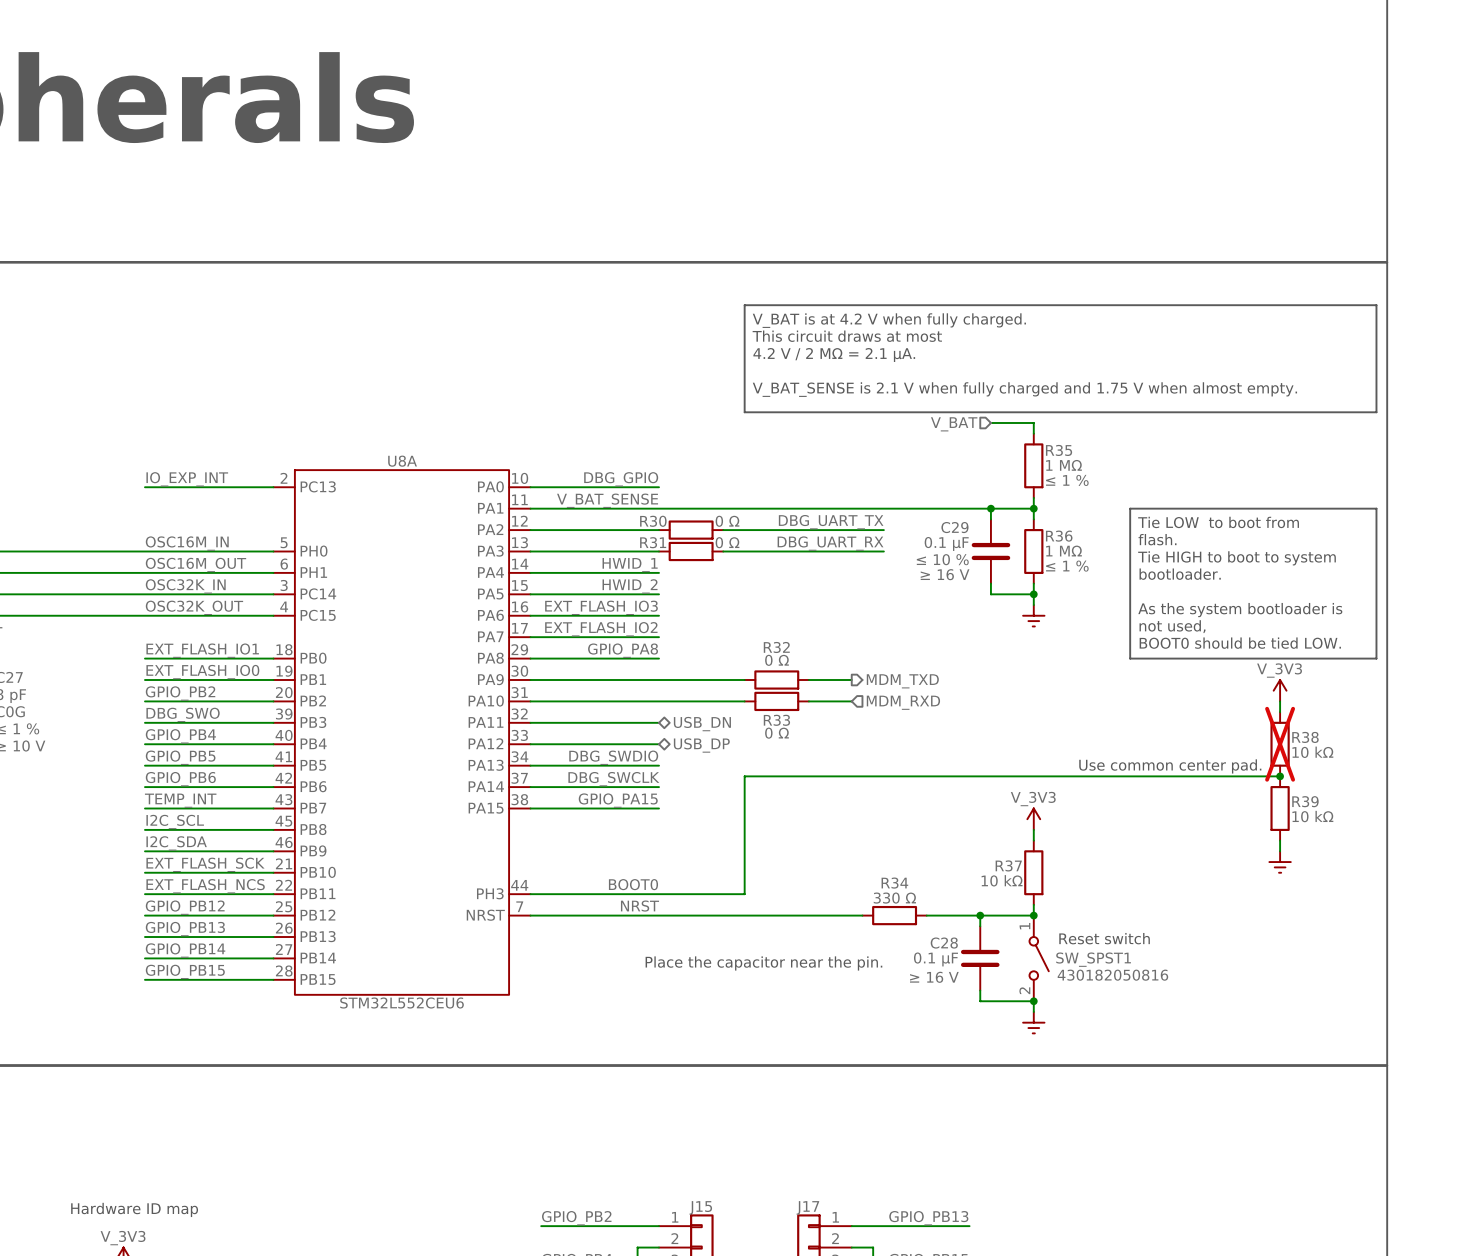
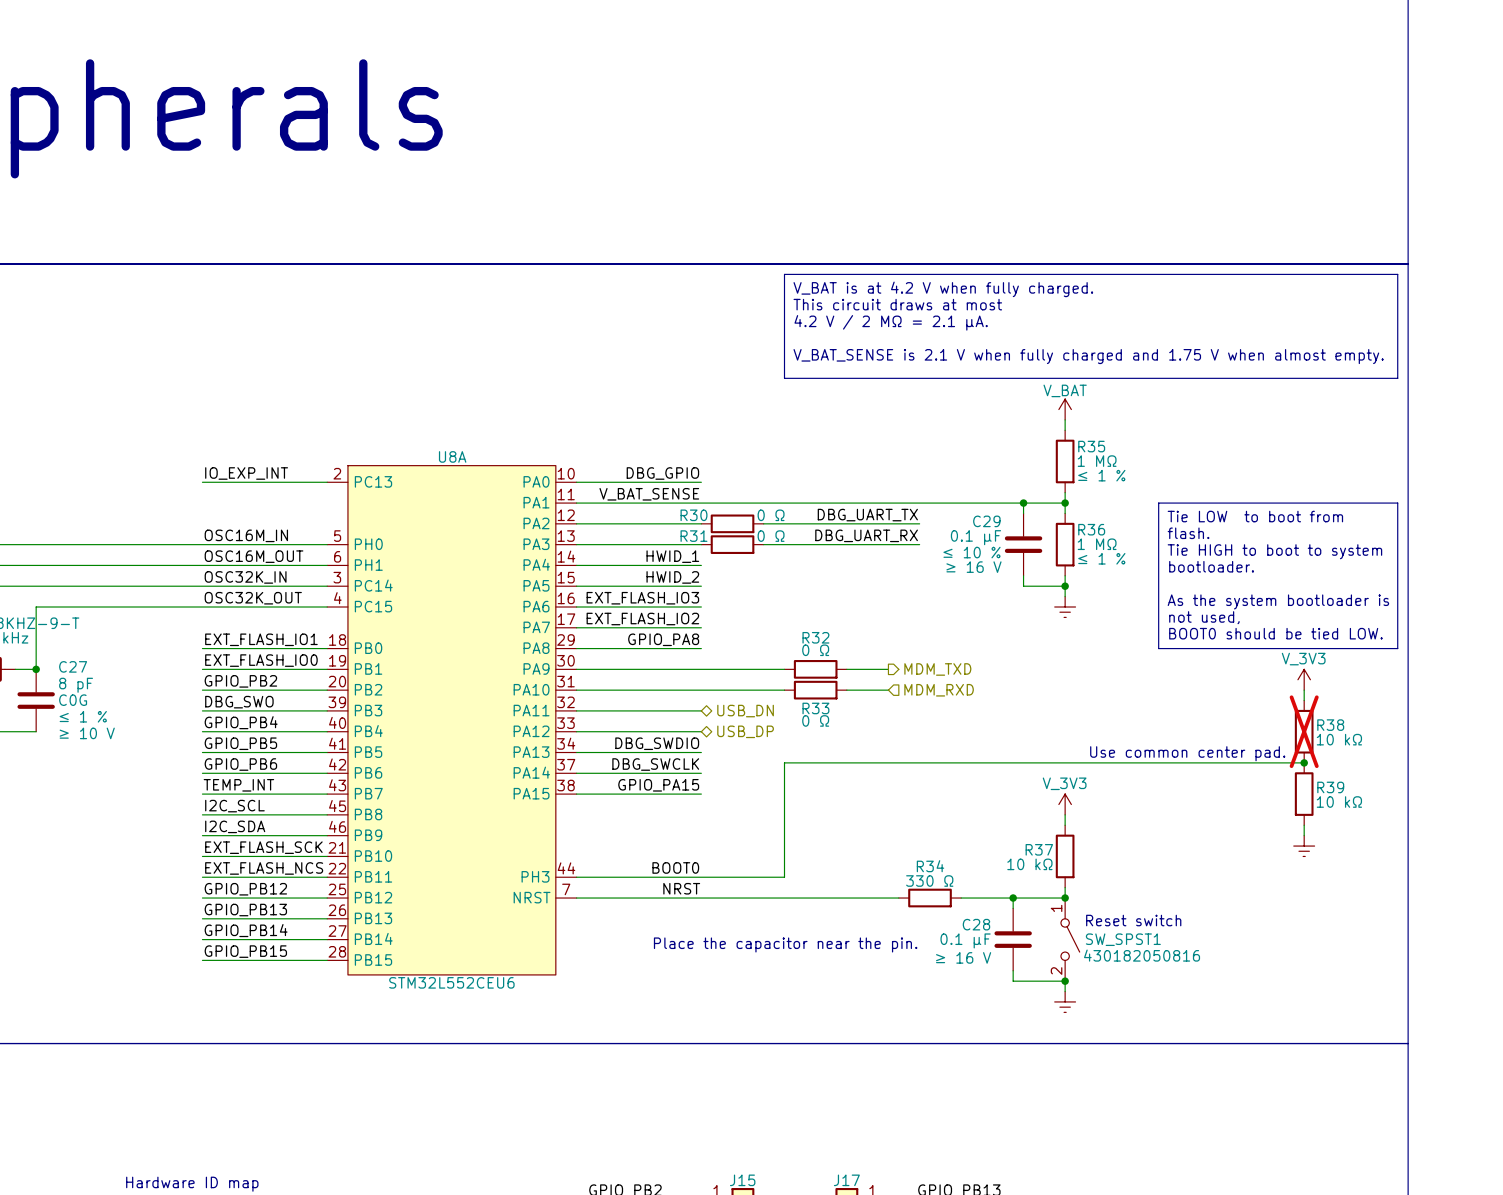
line: (744, 305) (1376, 305) -> (784, 305) (784, 274) (1397, 274) (1397, 305)
text position: V_BAT is at 4.2 V when fully charged. (889, 320) -> V_BAT is at 4.2 V when fully charged. (943, 289)
text position: This circuit draws at most (847, 336) -> This circuit draws at most (897, 304)
text position: 4.2 V / 2 MΩ = 2.1 µA. (834, 355) -> 4.2 V / 2 MΩ = 2.1 µA. (891, 322)
line: (744, 380) (744, 412) (1376, 412) (1376, 380) -> (784, 378) (1397, 378)
text position: V_BAT_SENSE is 2.1 V when fully charged and 1.75 V when almost empty. (1024, 389) -> V_BAT_SENSE is 2.1 V when fully charged and 1.75 V when almost empty. (1088, 356)
power symbol: none -> V_BAT (1065, 409)
wire: (990, 422) (1033, 422) -> none
hierarchical label: V_BAT (954, 424) -> none

